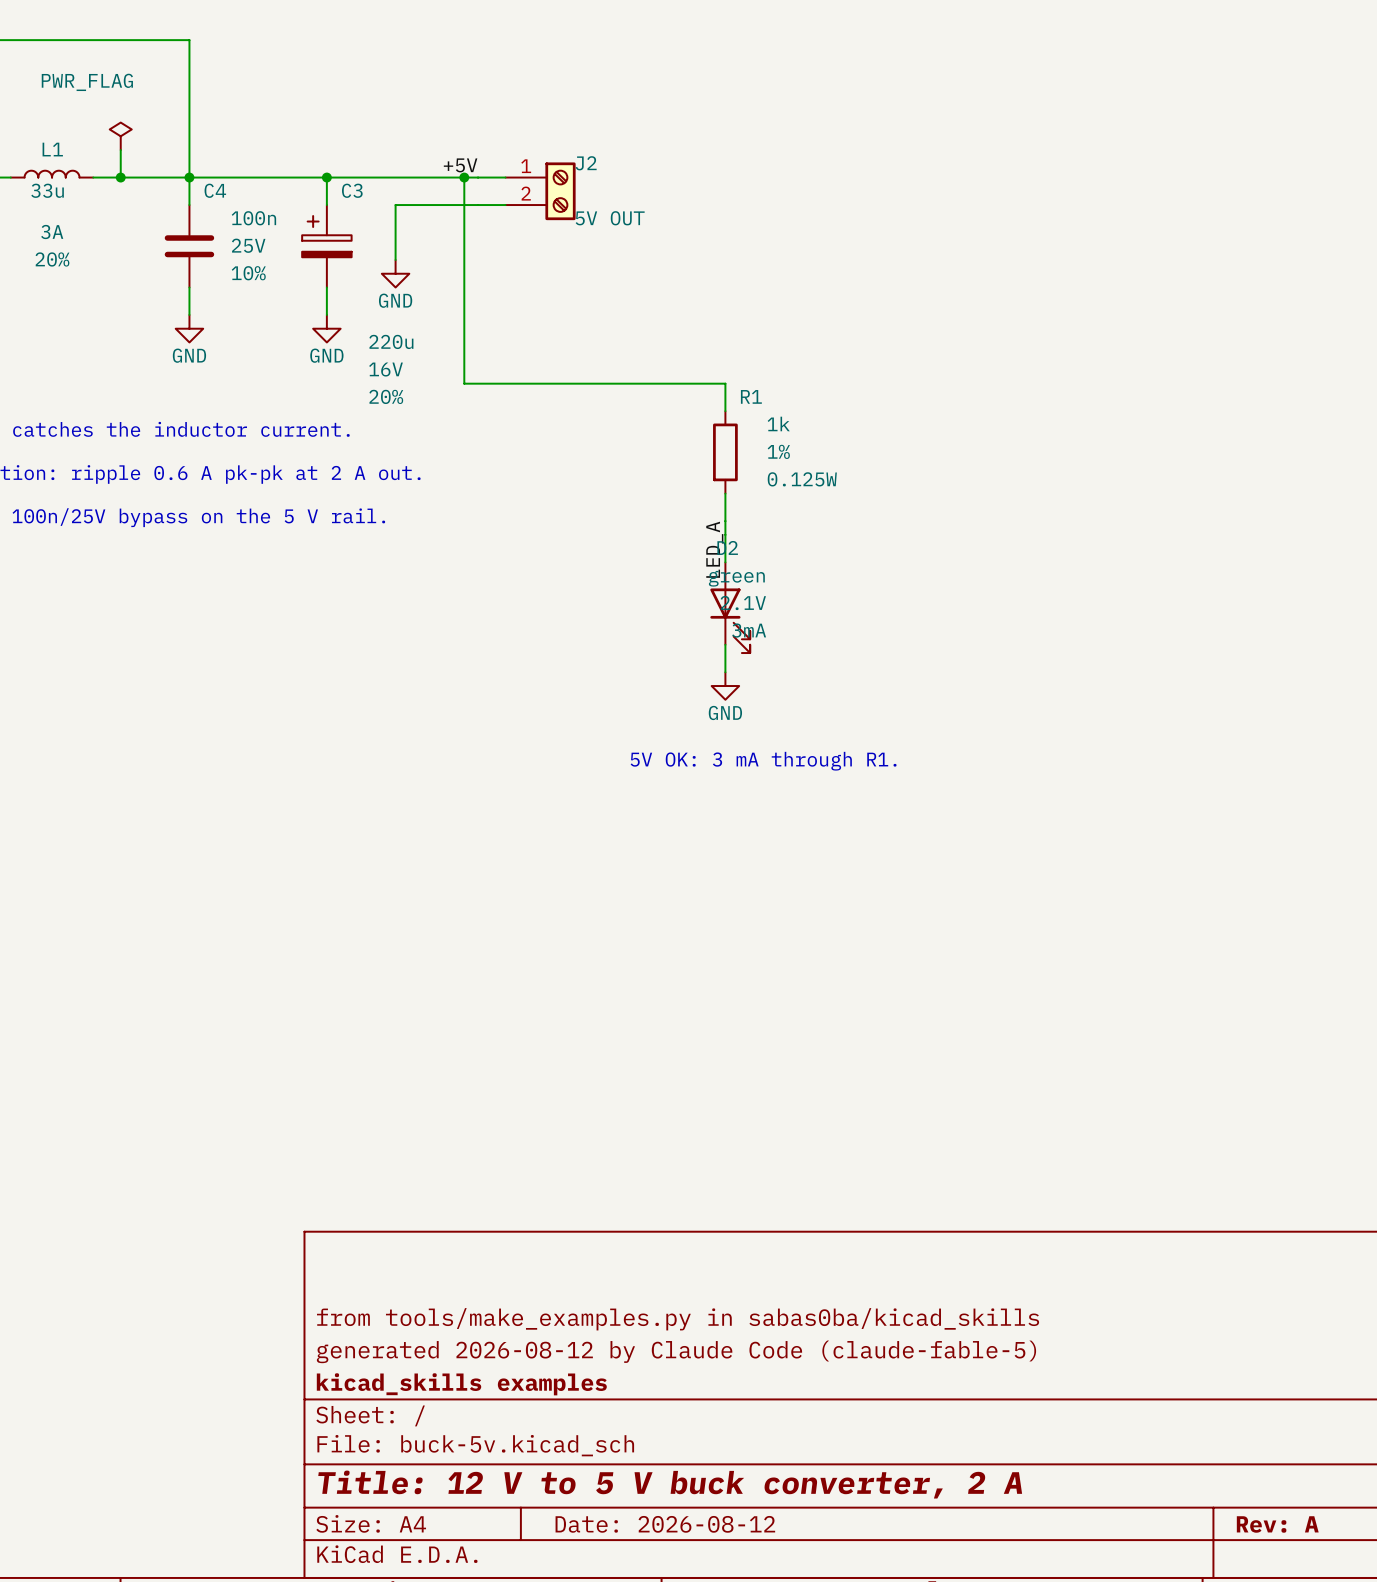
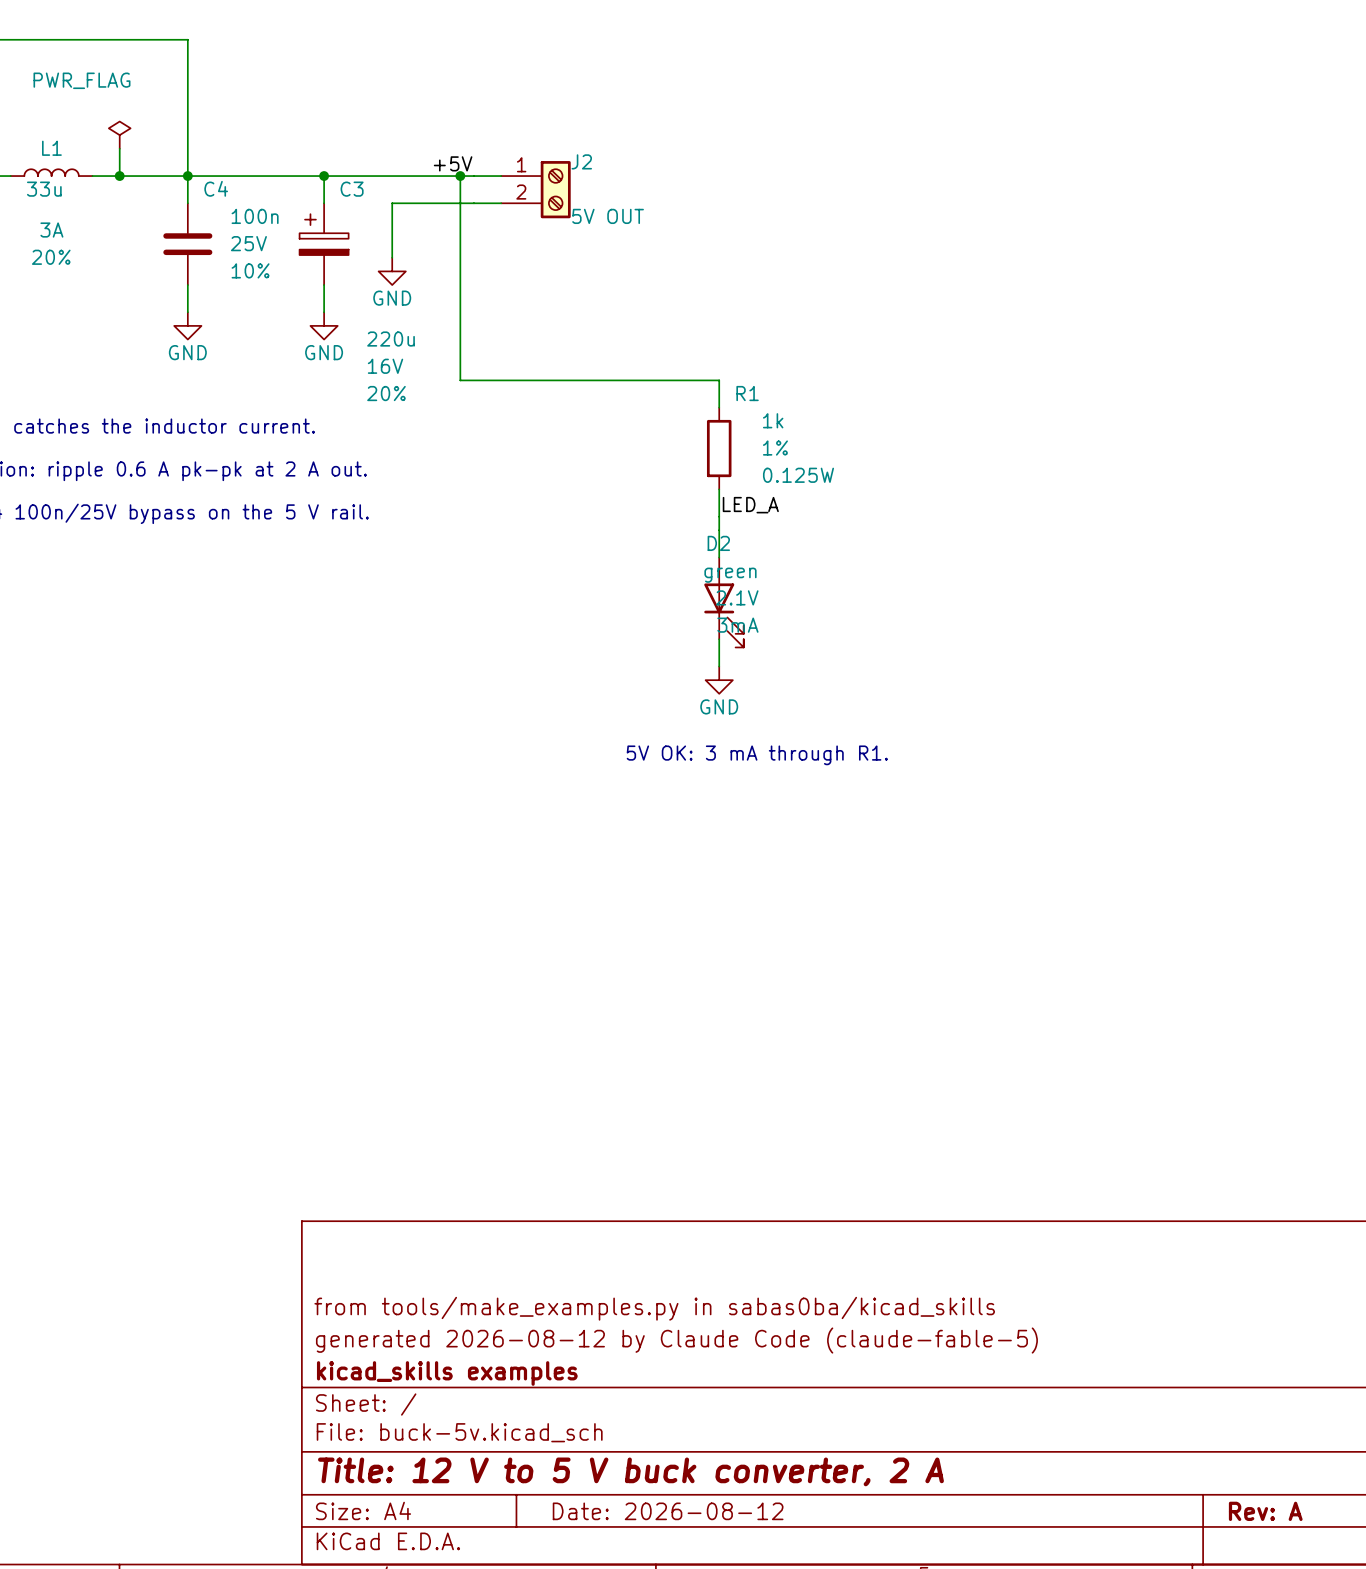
label rotation: 0° (714, 549) -> 90° clockwise (750, 505)

